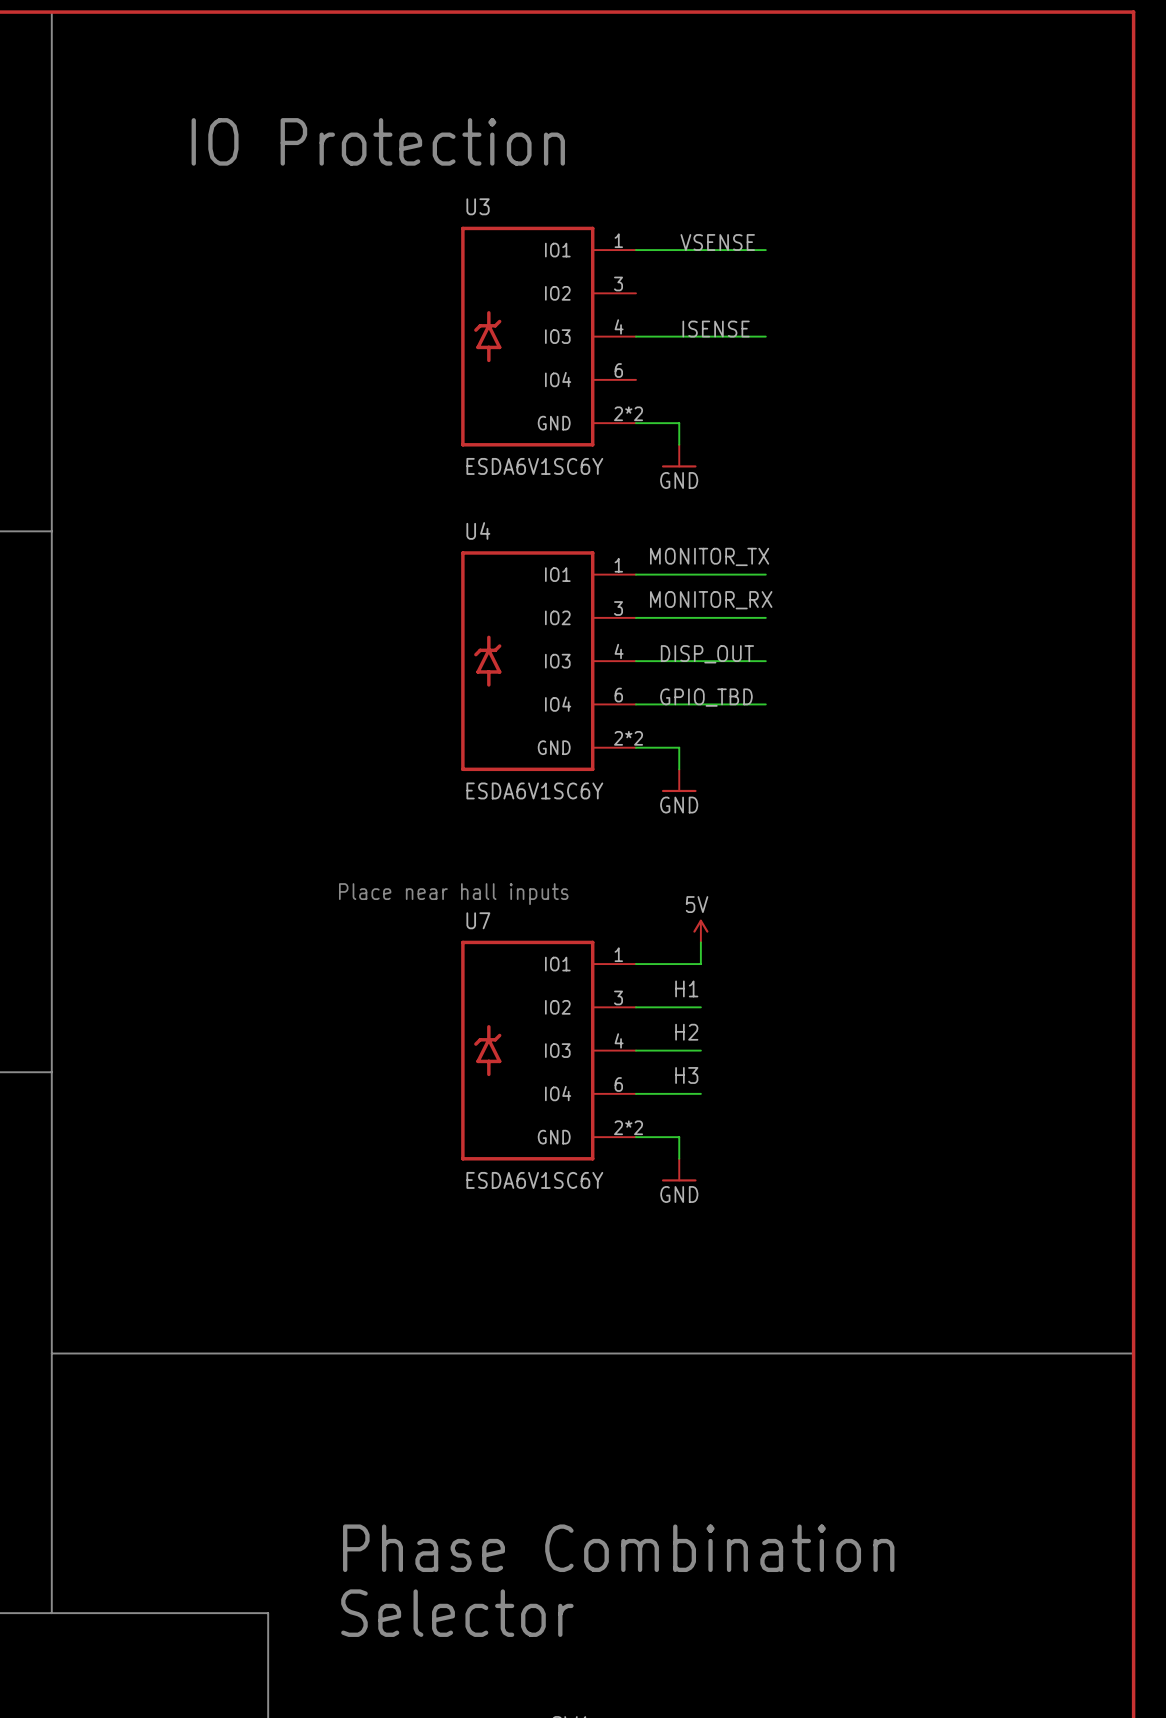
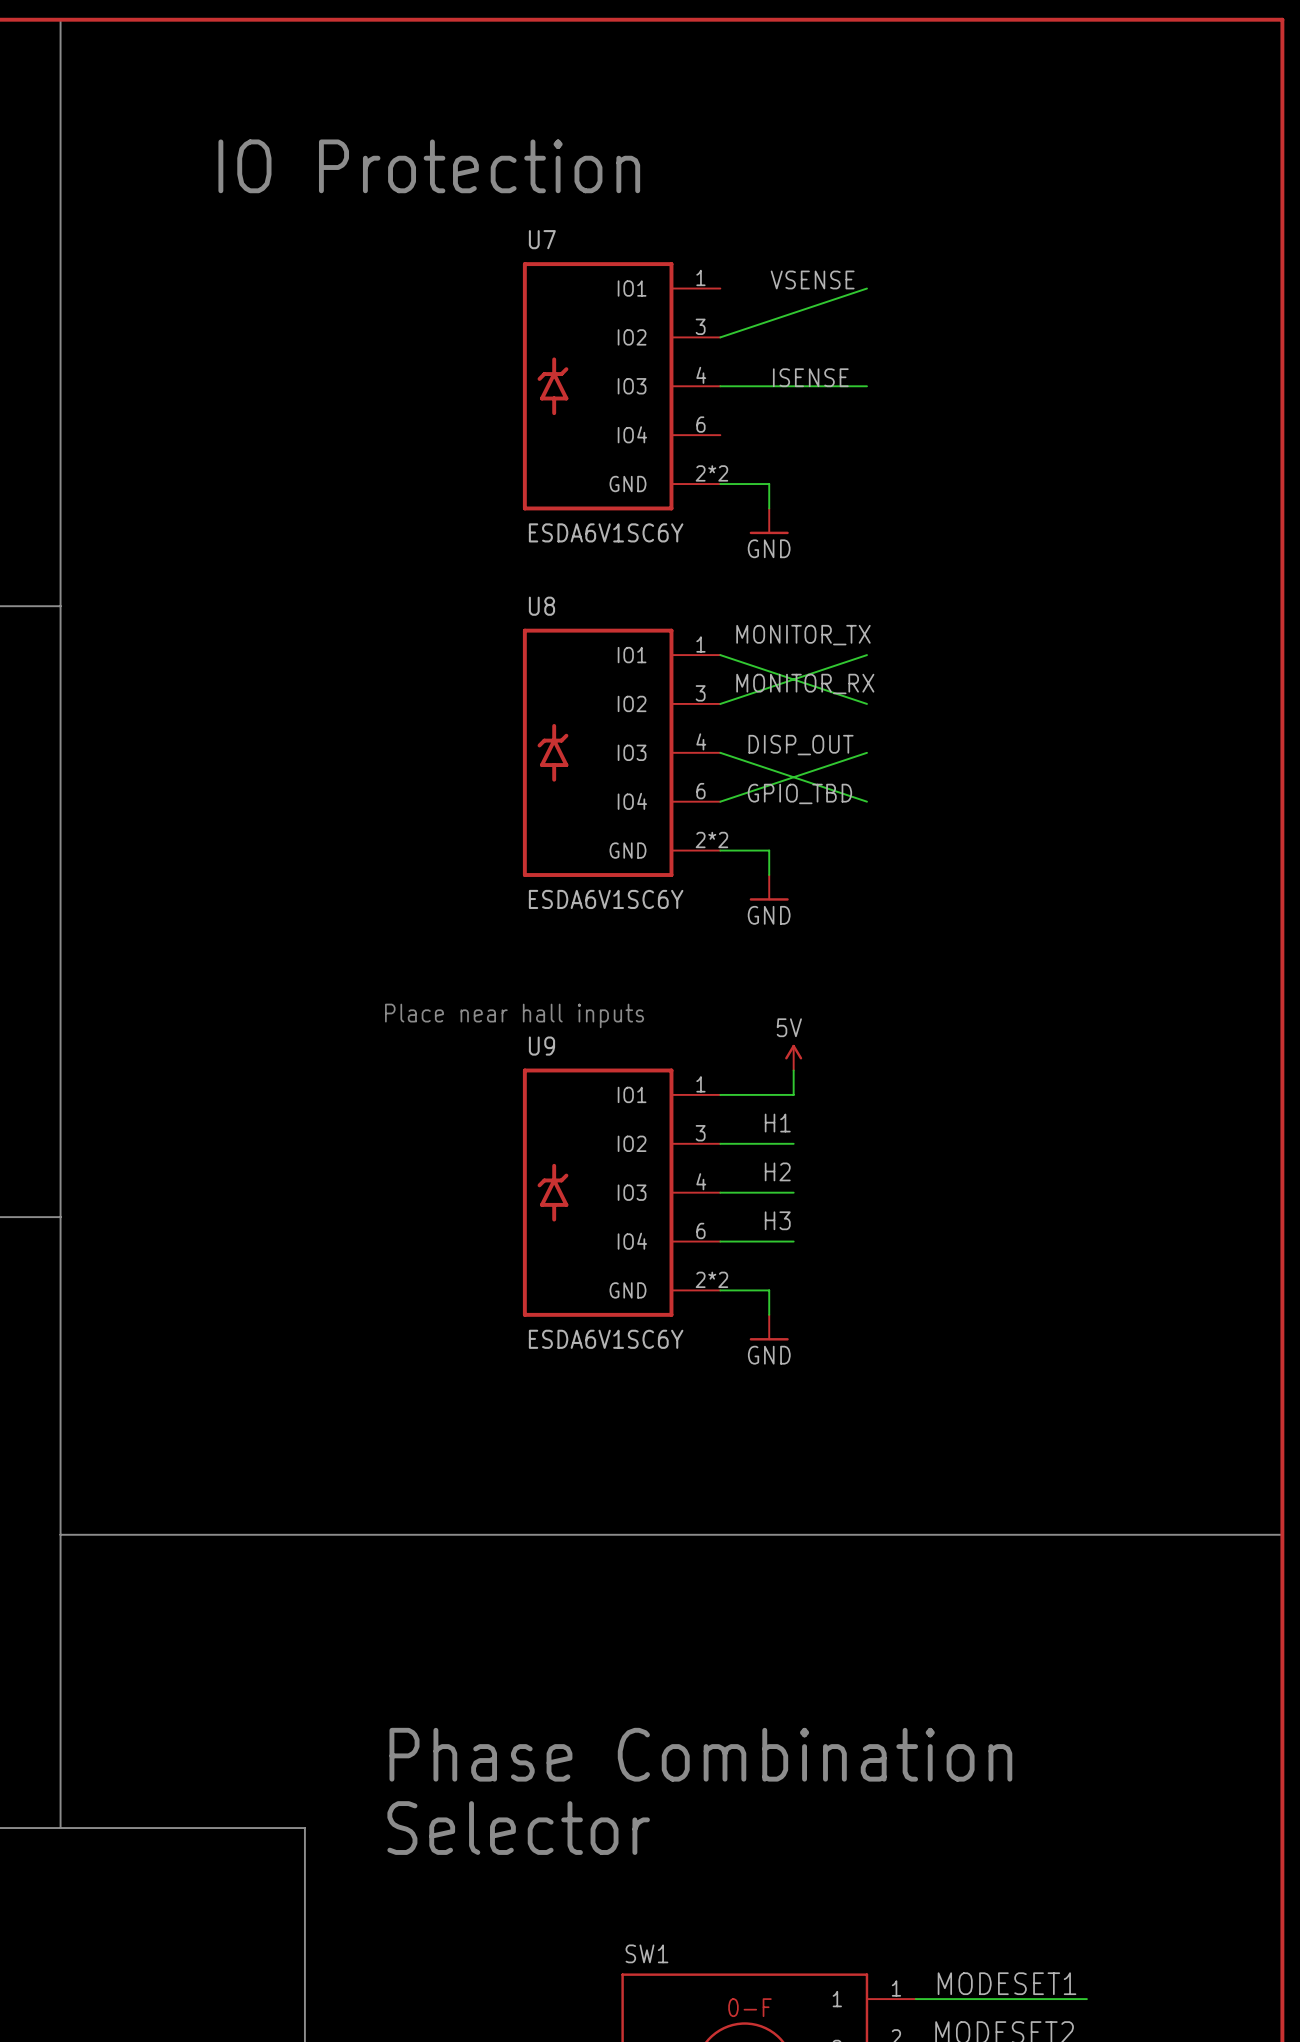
U3 name: U3 (478, 206) -> U7 (542, 239)
wire: (635, 250) (765, 250) -> (720, 337) (866, 288)
U4 name: U4 (478, 530) -> U8 (541, 606)
wire: (635, 574) (765, 574) -> (720, 655) (866, 703)
wire: (635, 617) (765, 617) -> (720, 703) (866, 655)
wire: (635, 661) (765, 661) -> (720, 752) (866, 801)
wire: (635, 704) (765, 704) -> (720, 801) (866, 752)
U7 name: U7 (478, 920) -> U9 (541, 1046)

